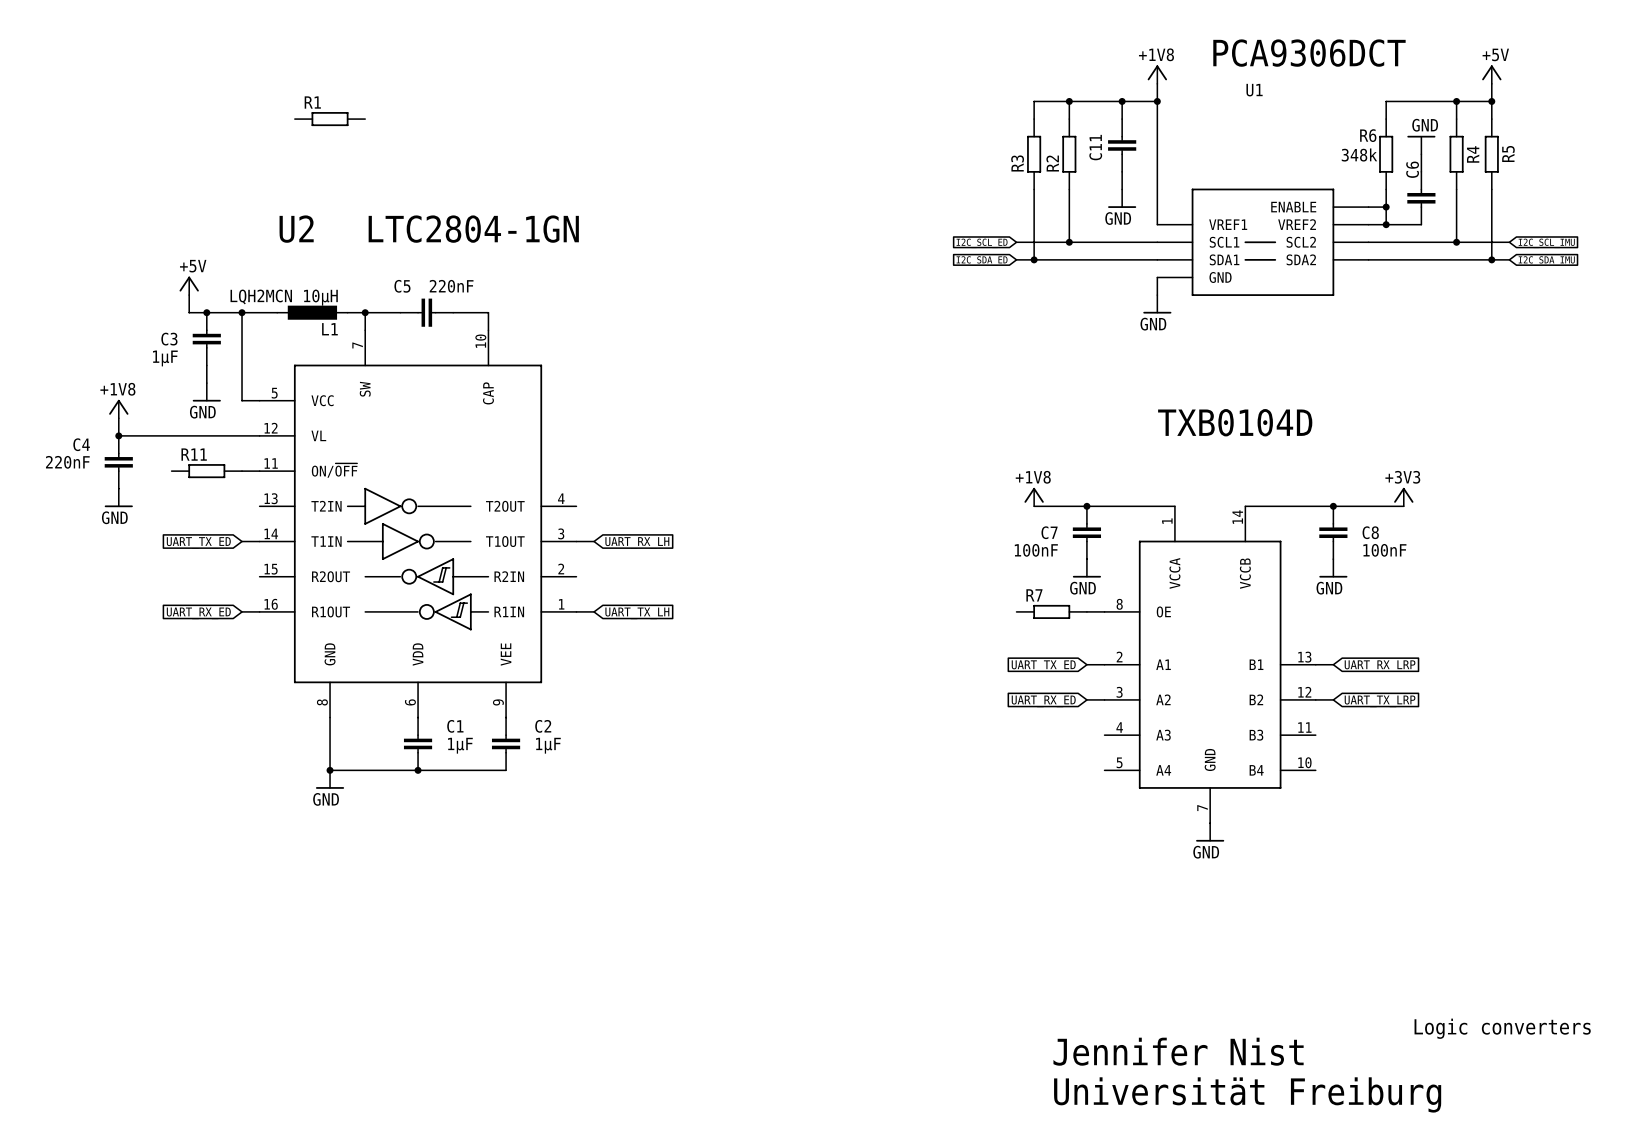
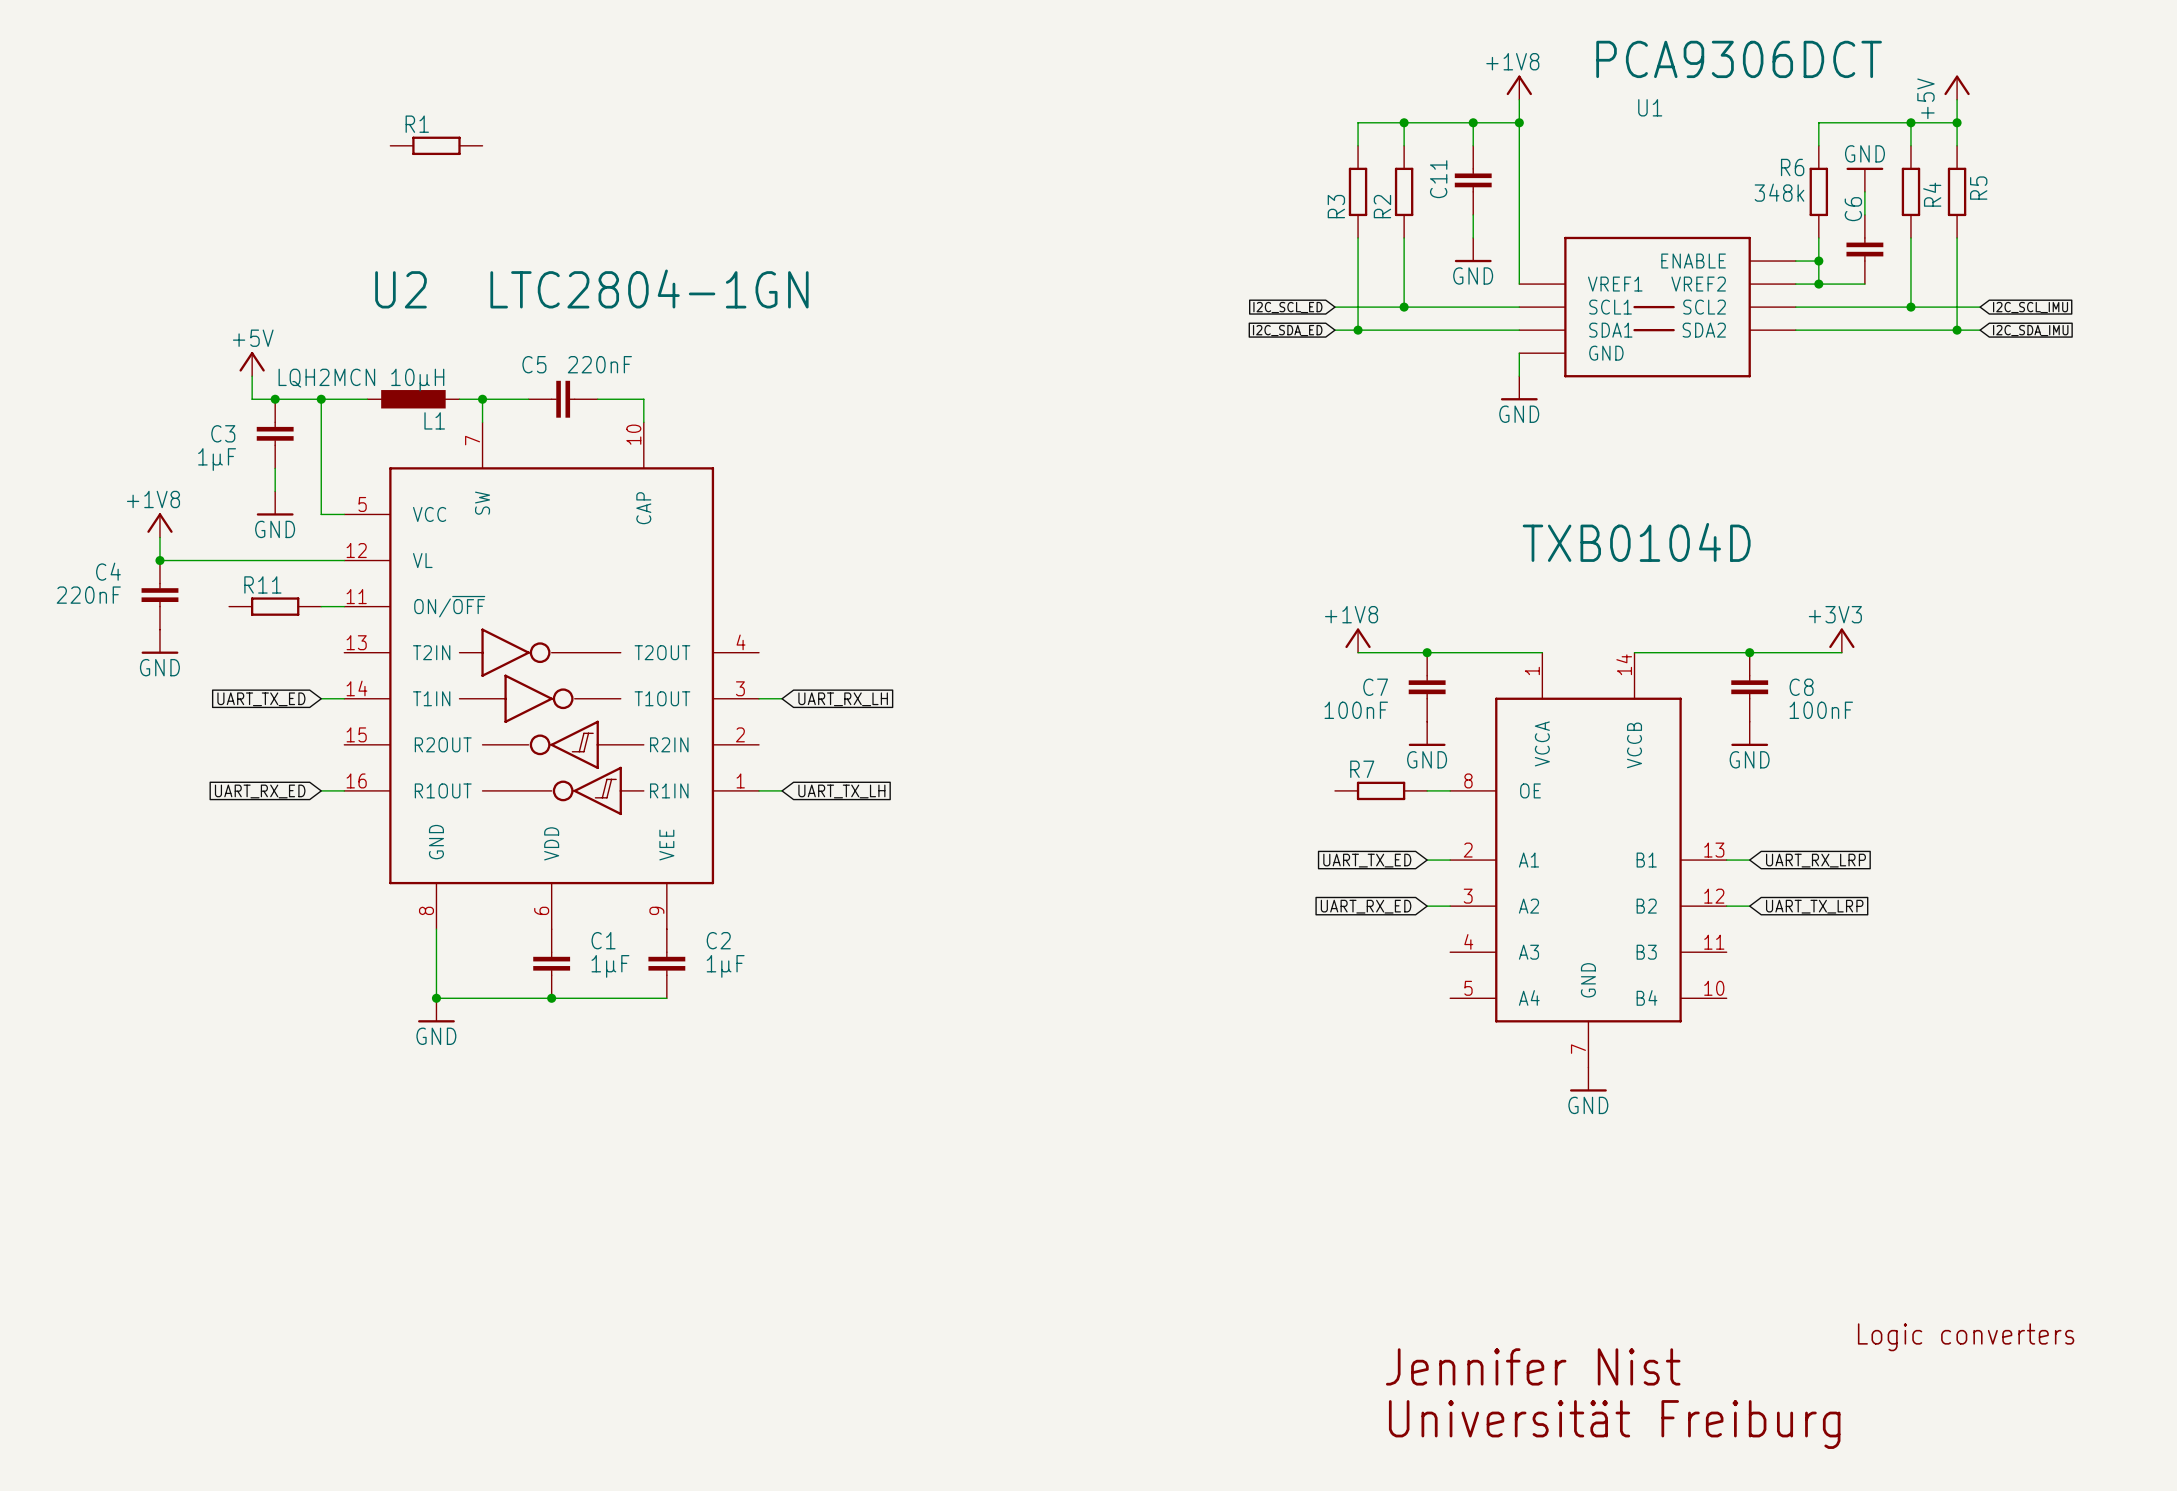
power symbol text rotation: 0° (1495, 54) -> 90° counterclockwise (1925, 98)

